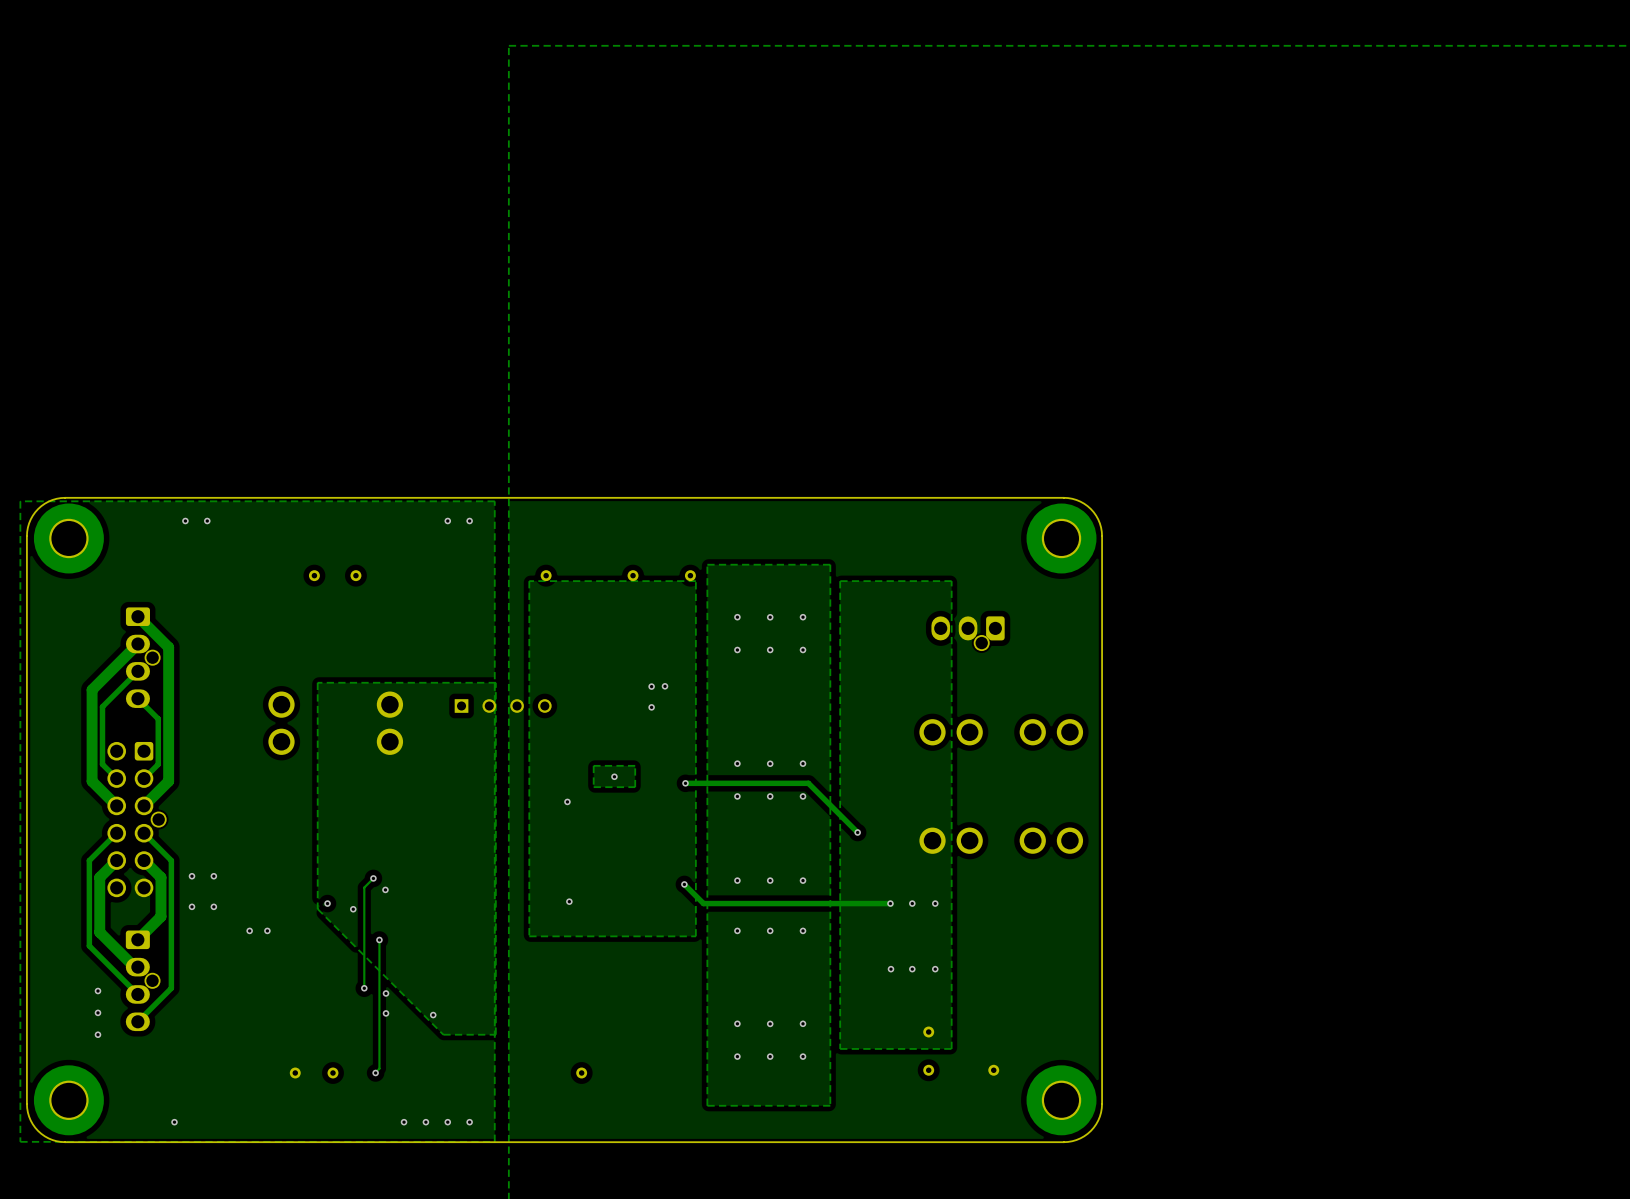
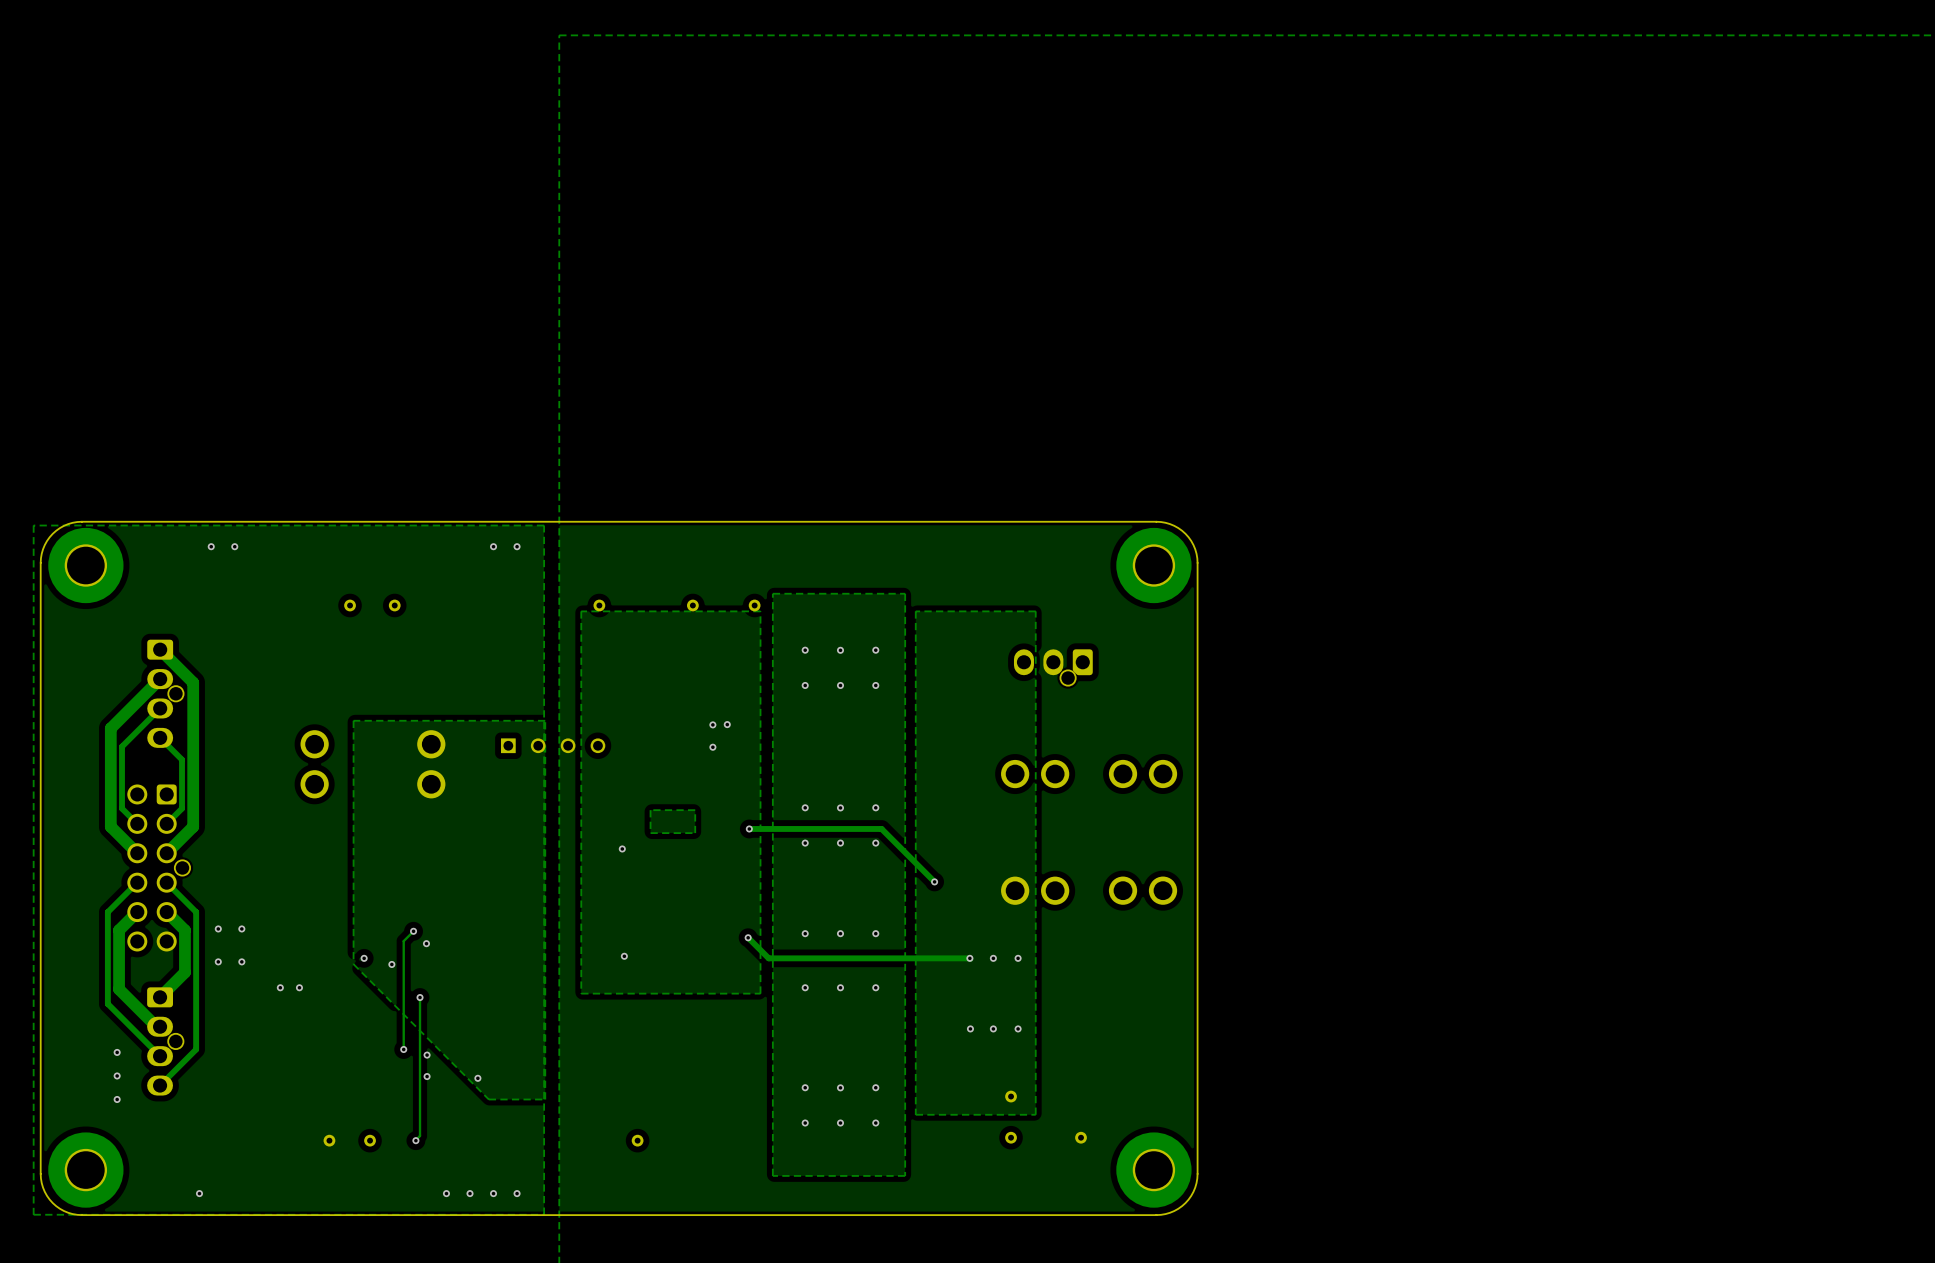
via: (614, 776) -> none

